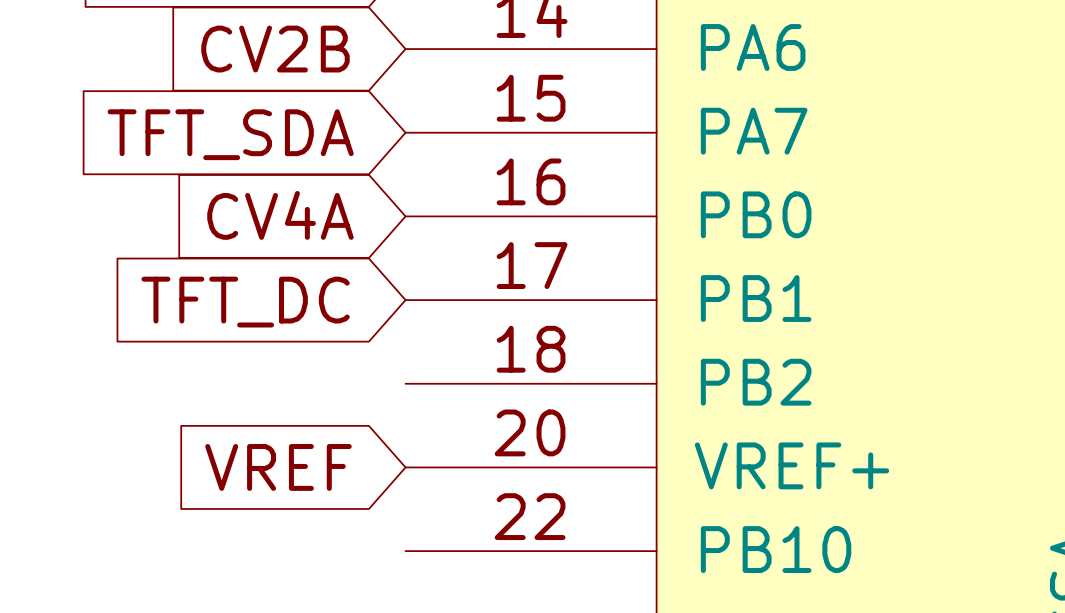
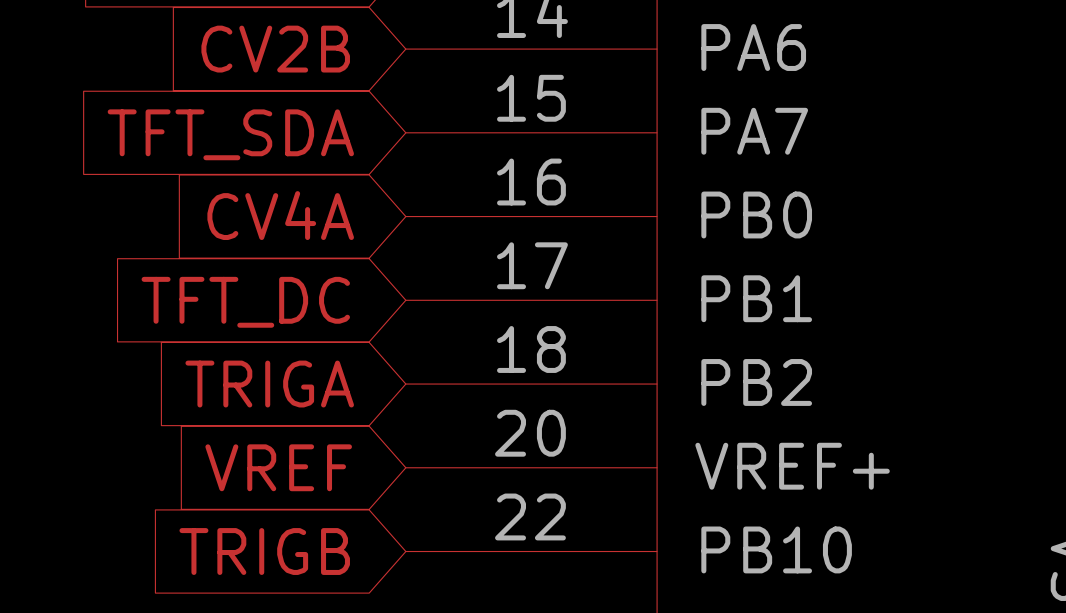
global label: none -> TRIGA (269, 384)
global label: none -> TRIGB (264, 551)

